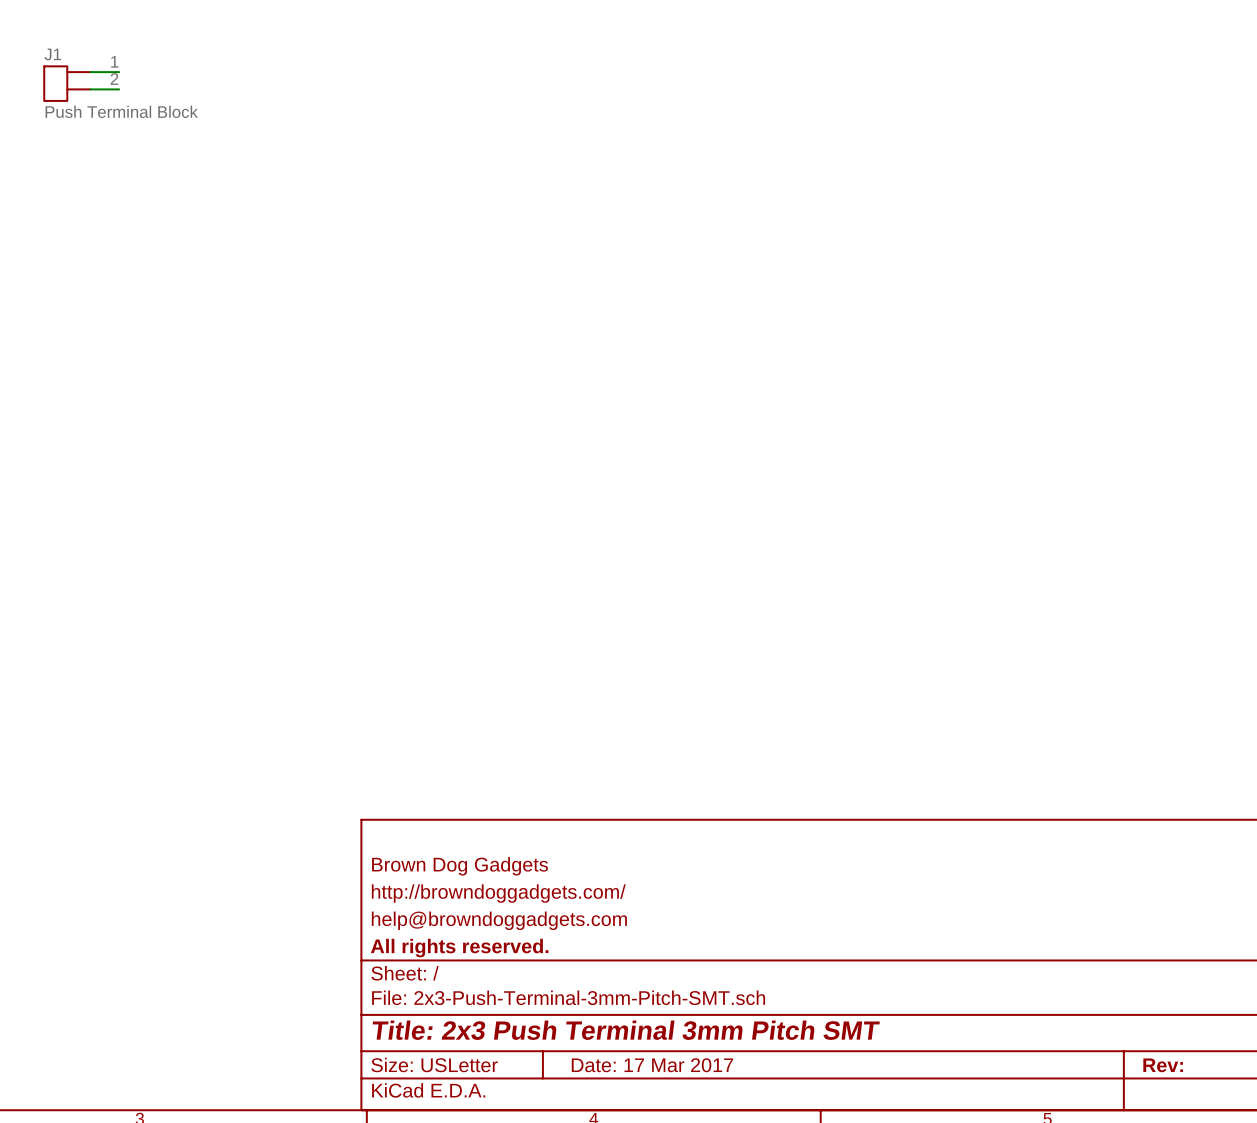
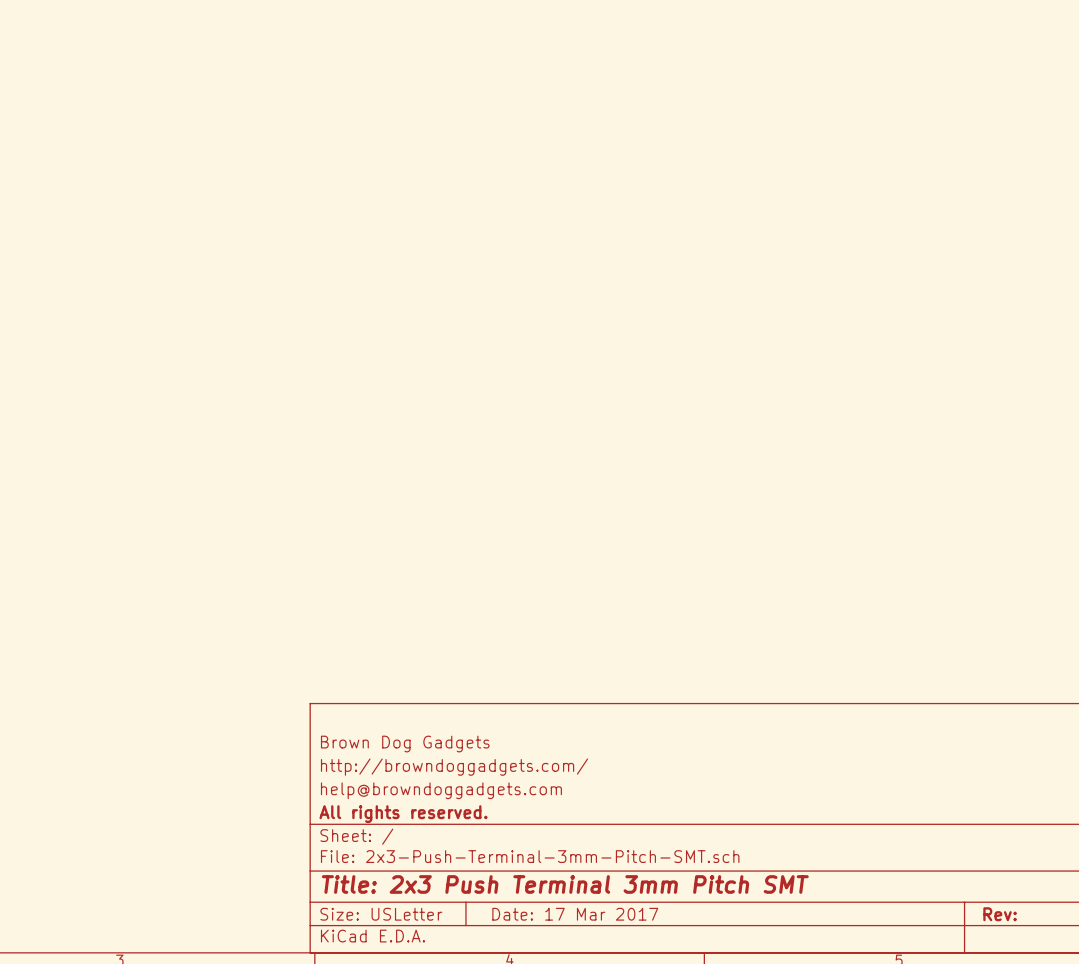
label: 1 (114, 61) -> none
wire: (90, 72) (119, 72) -> none
label: 2 (114, 79) -> none
J1: Push Terminal Block (67, 83) -> none
wire: (90, 89) (119, 89) -> none

